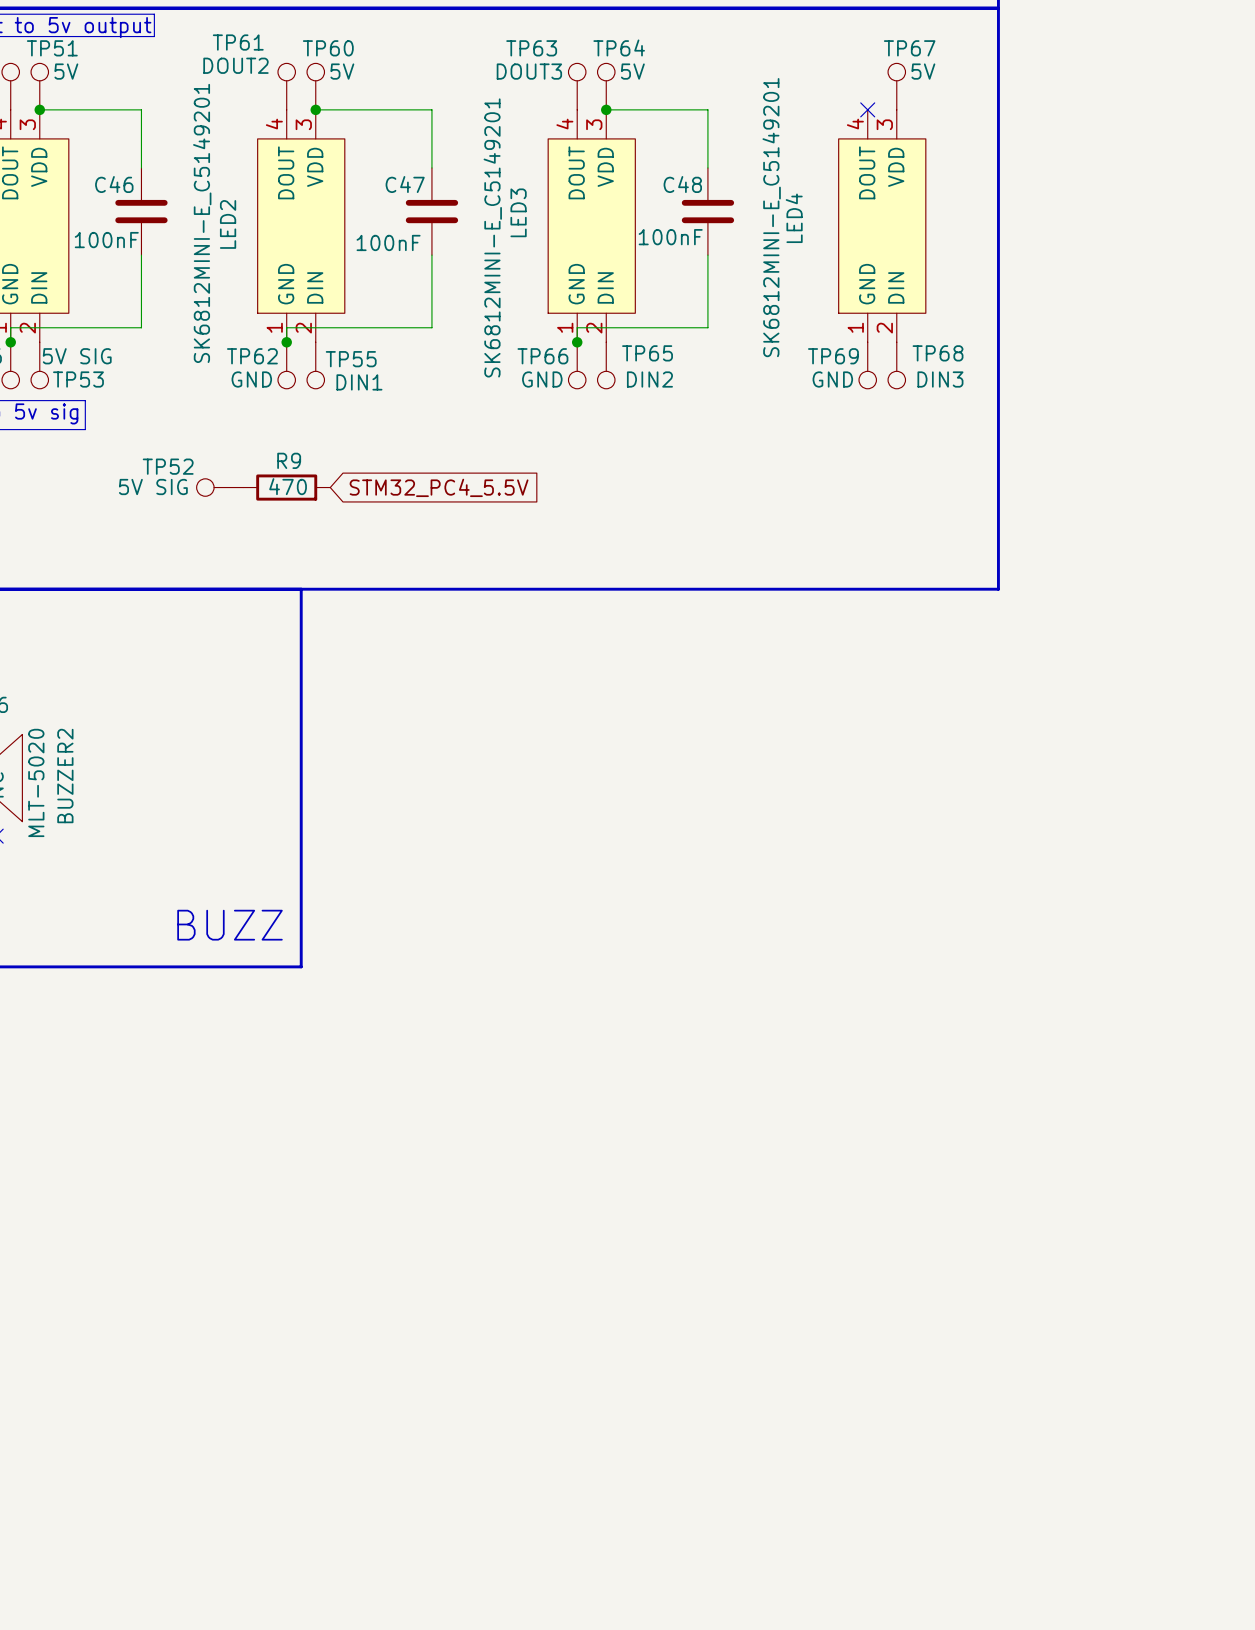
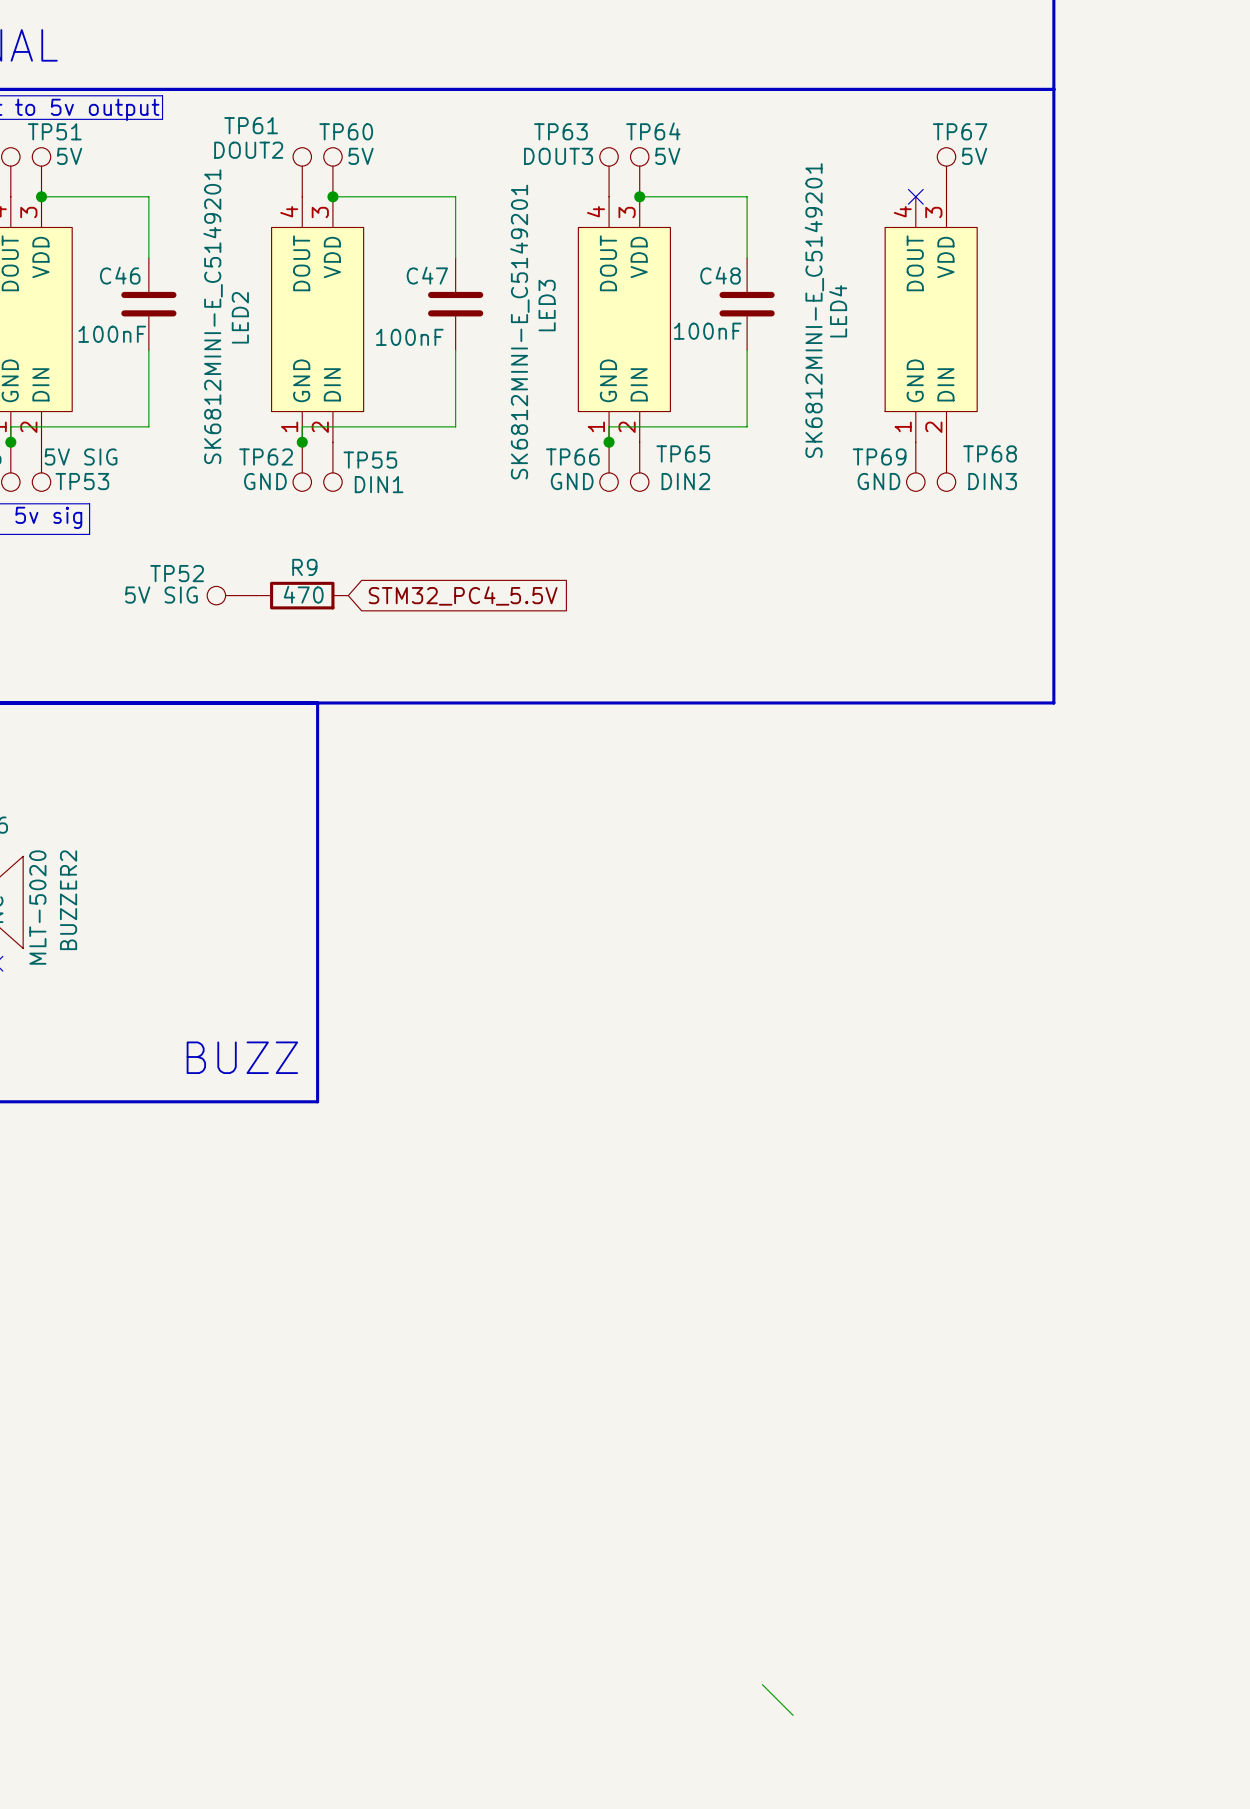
wire: none -> (762, 1684) (793, 1715)

